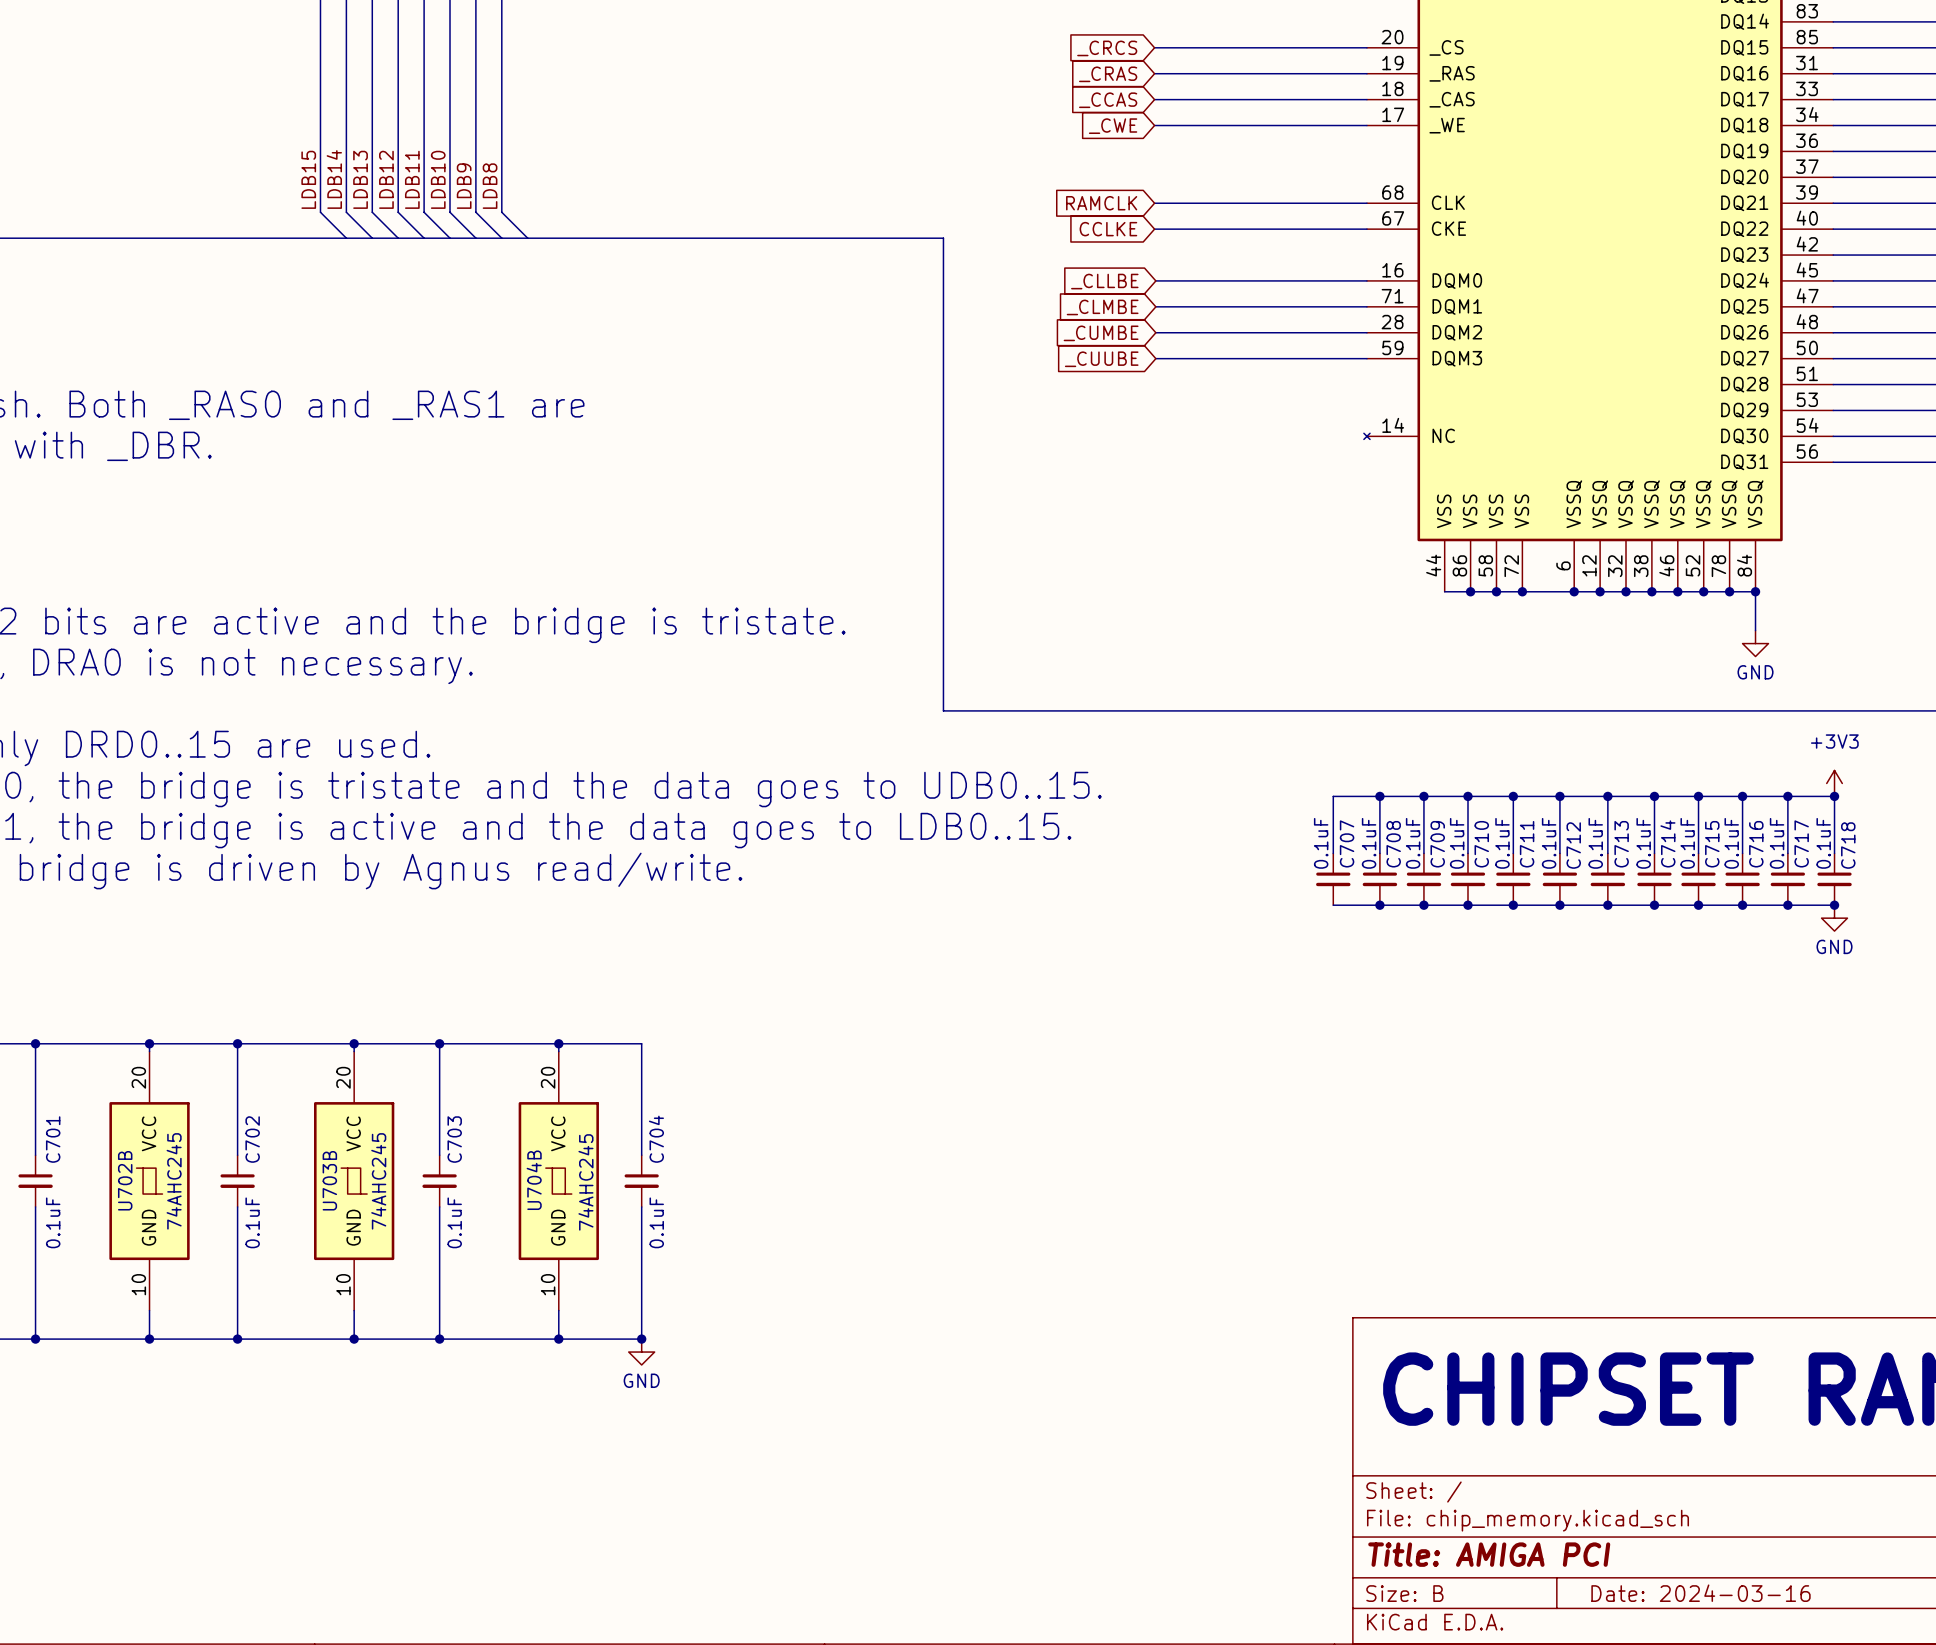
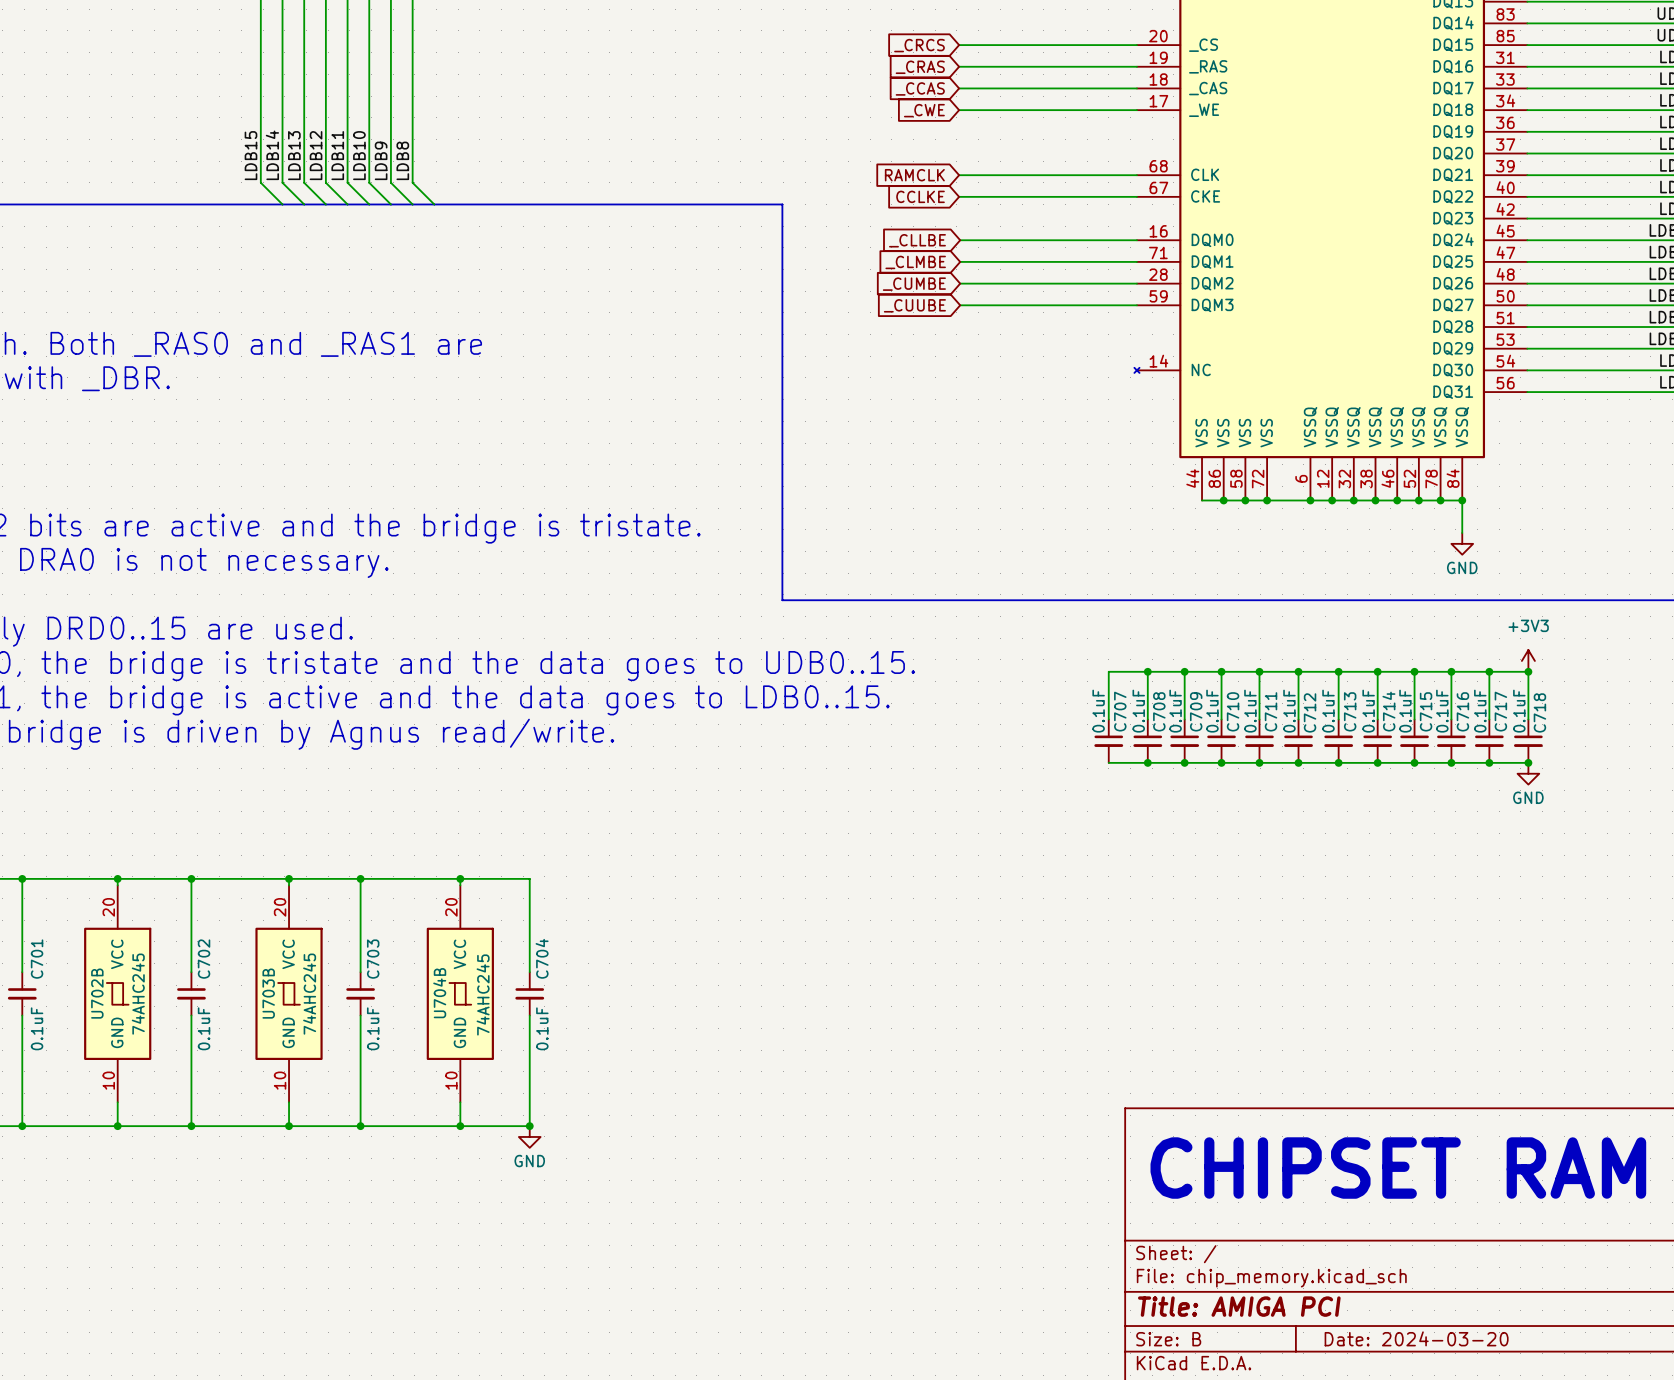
title block: Date: 2024-03-16 (1701, 1593) -> Date: 2024-03-20 (1416, 1338)

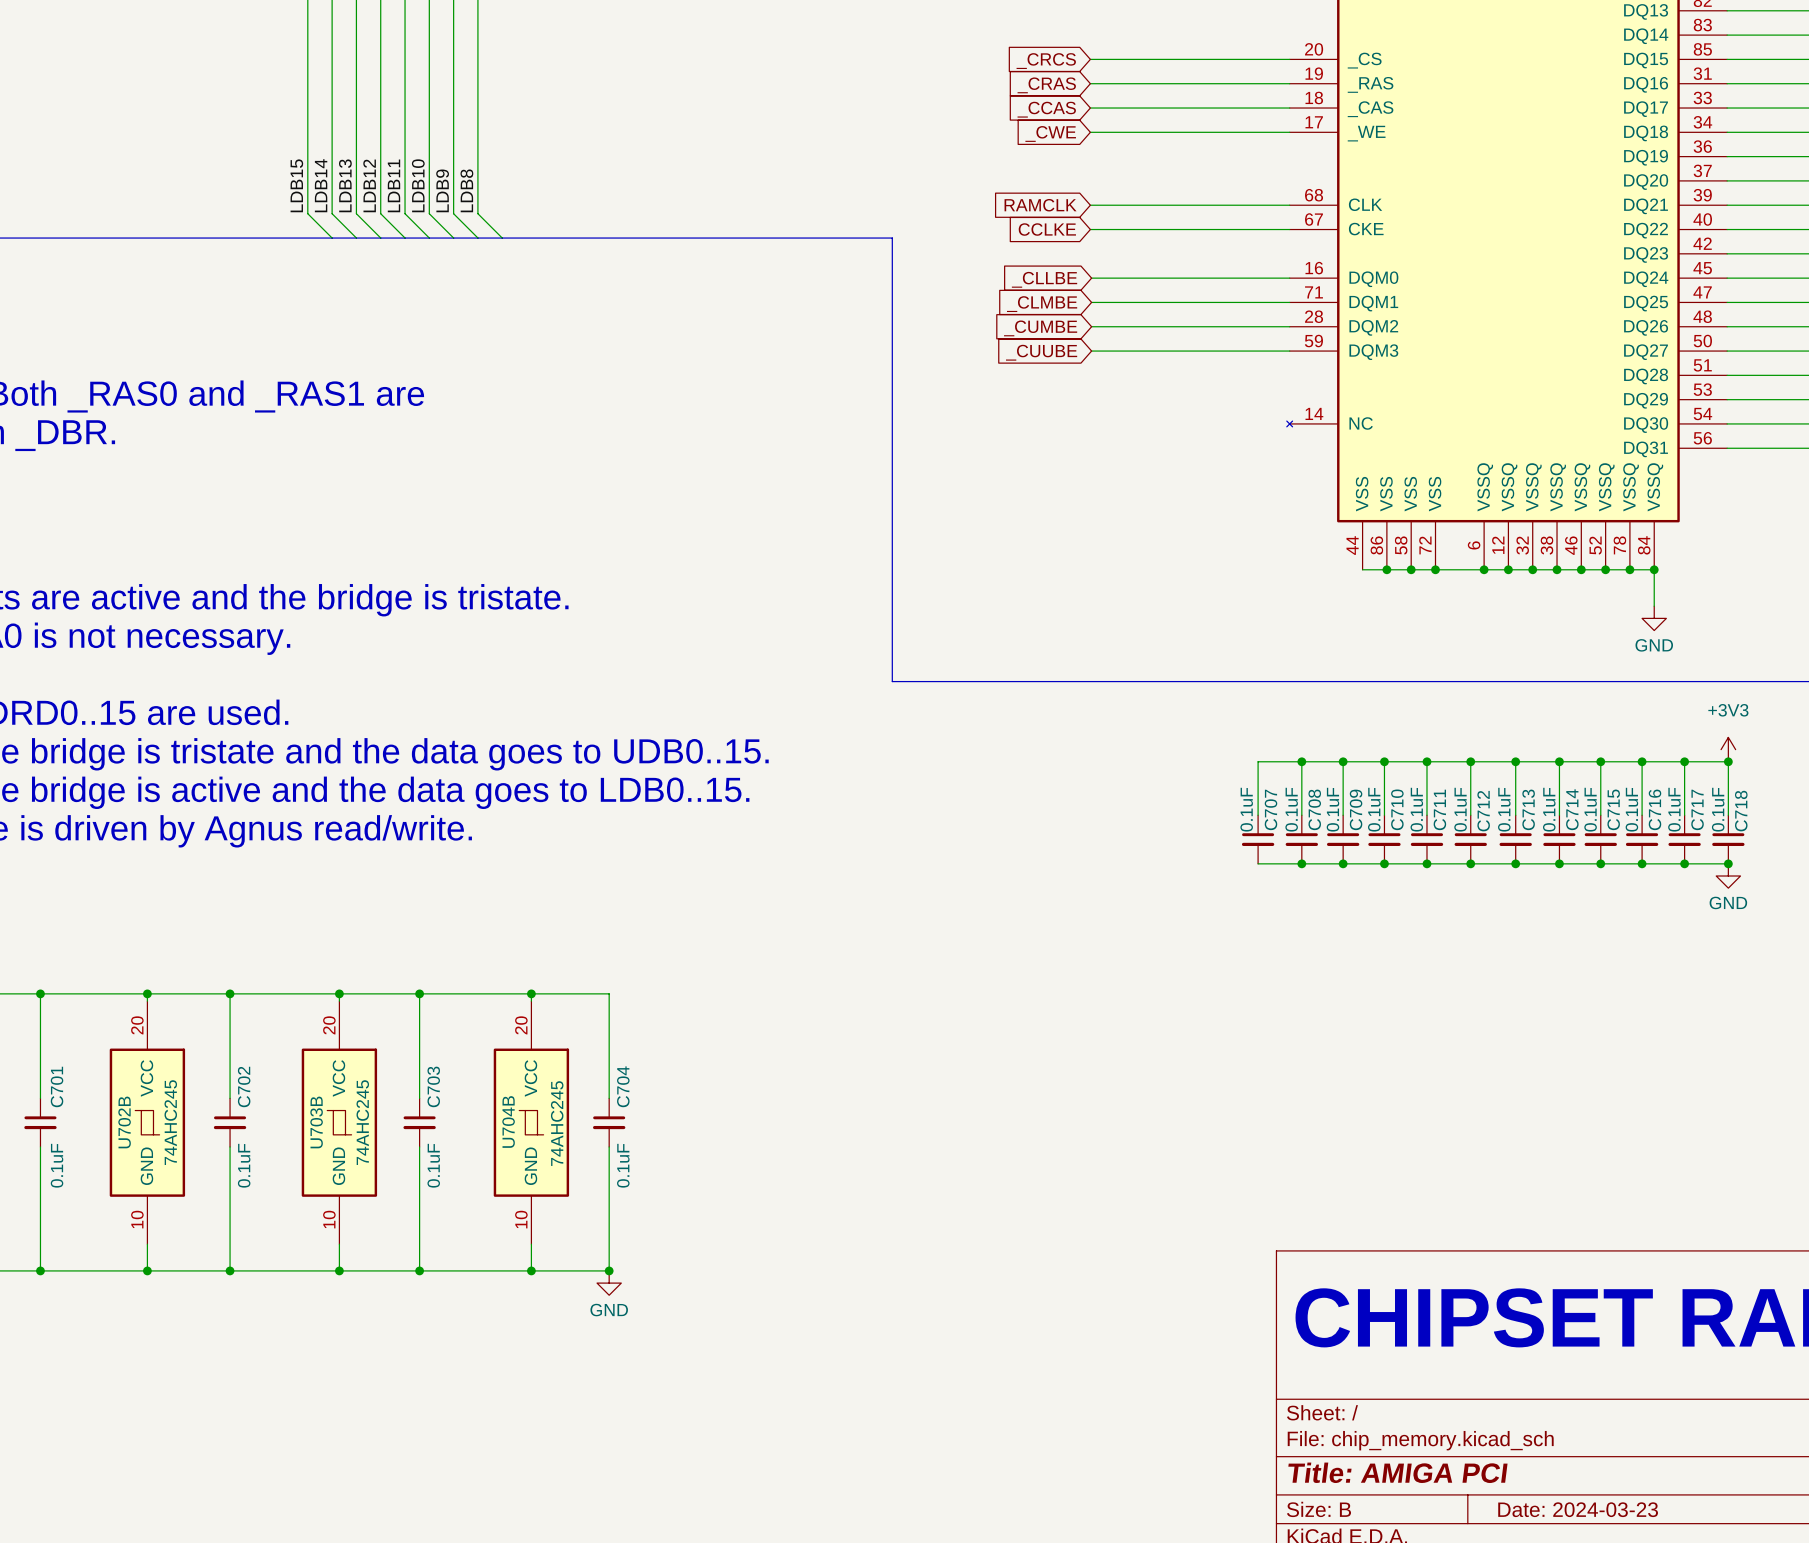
title block: Date: 2024-03-20 (1416, 1338) -> Date: 2024-03-23 (1578, 1509)

